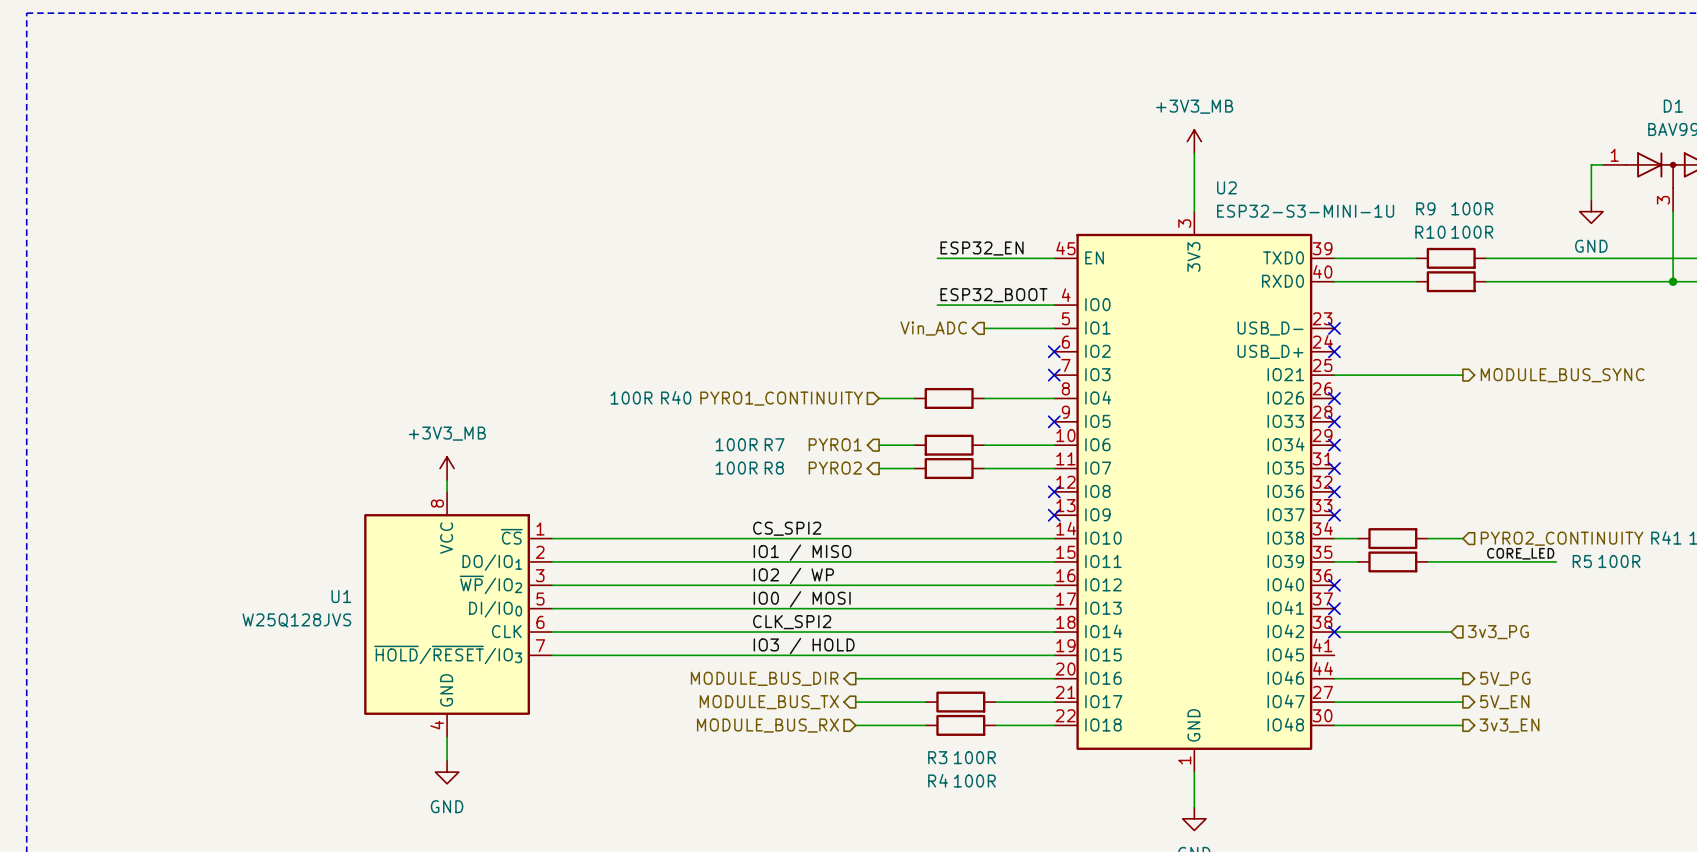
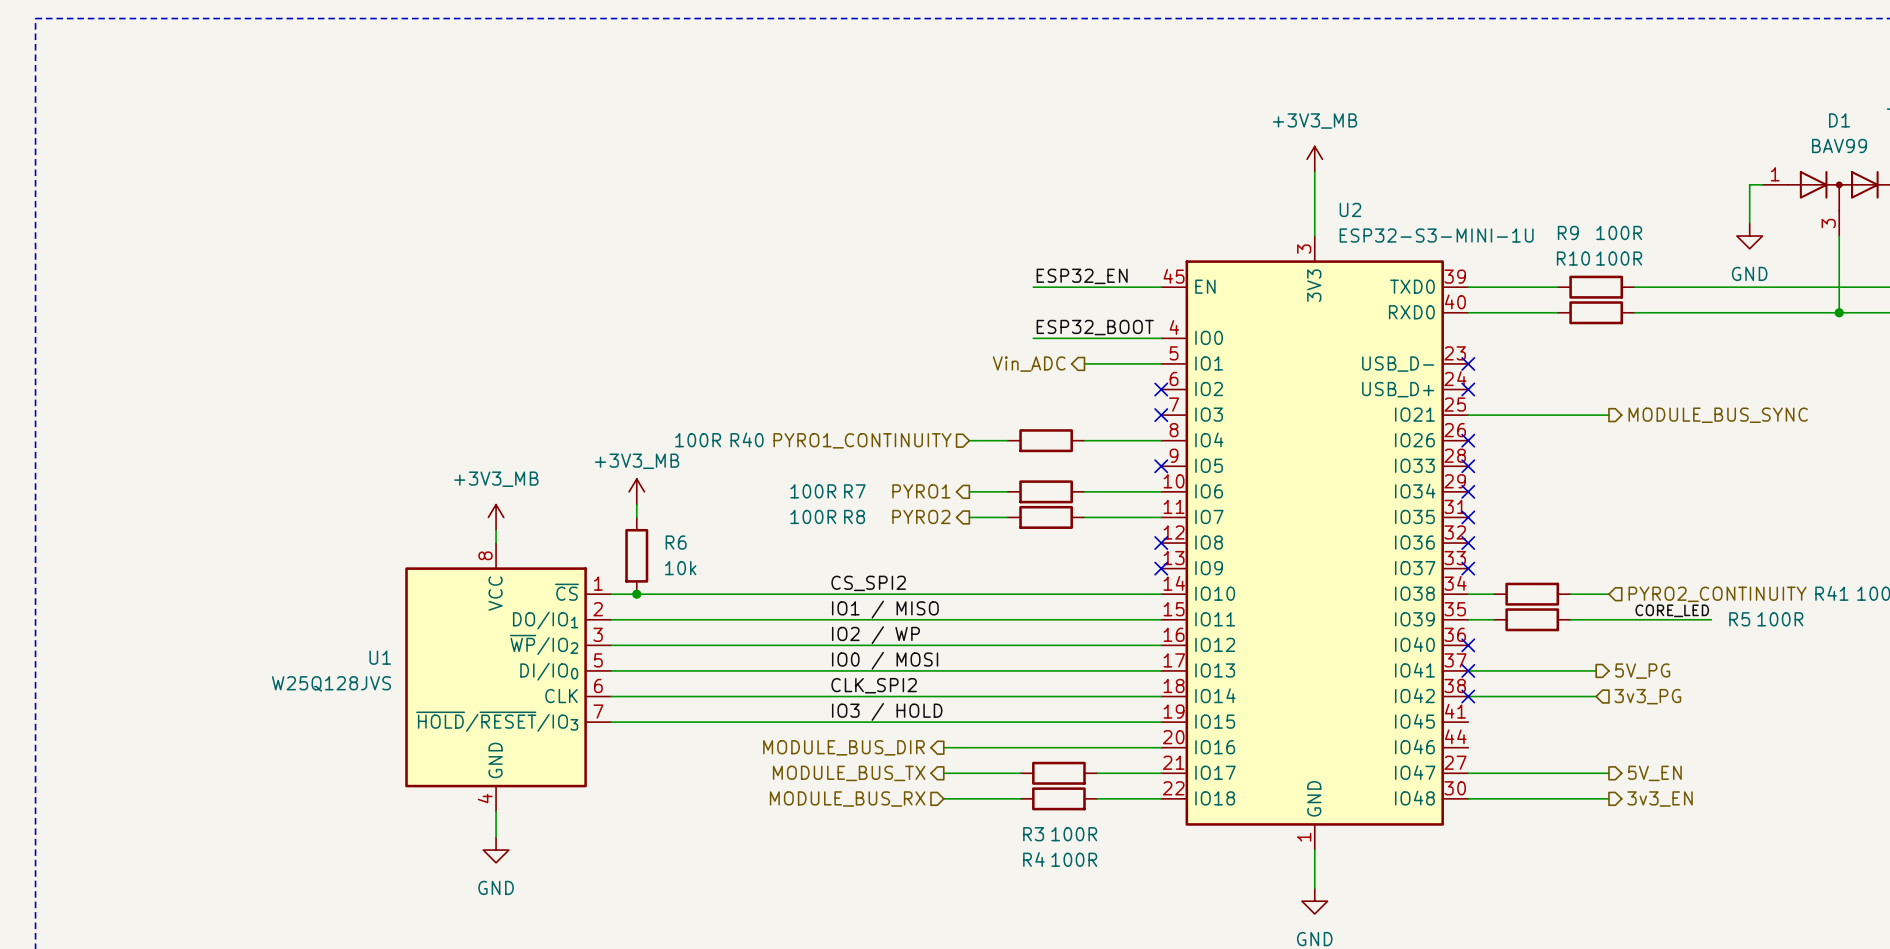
power symbol: none -> +3V3_MB (636, 491)
wire: none -> (636, 504) (636, 517)
R6: none -> 10k (636, 555)
junction: none -> (636, 594)
wire: none -> (1468, 670) (1596, 670)
wire: (1334, 678) (1462, 678) -> none
hierarchical label position: 5V_PG (1505, 678) -> 5V_PG (1642, 671)

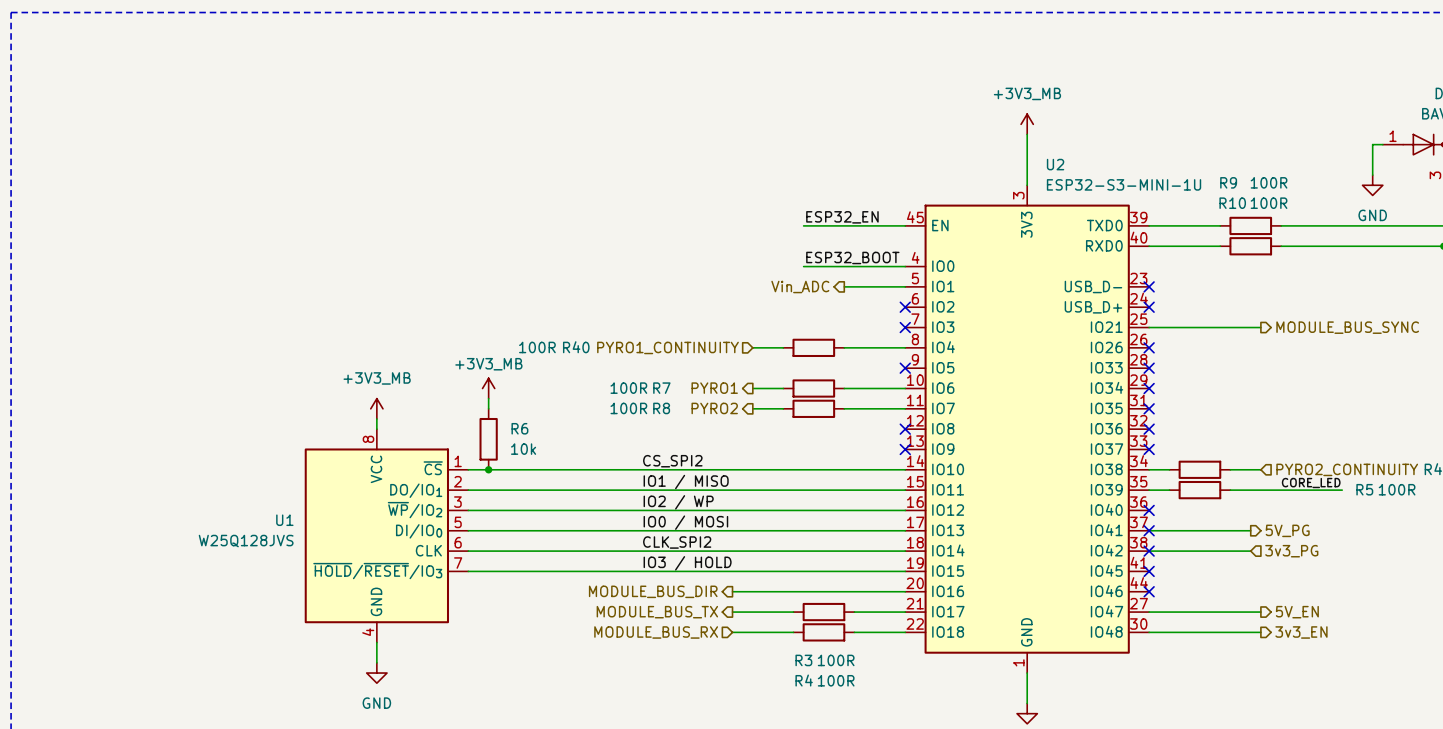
no-connect mark: none -> (1149, 571)
no-connect mark: none -> (1149, 591)

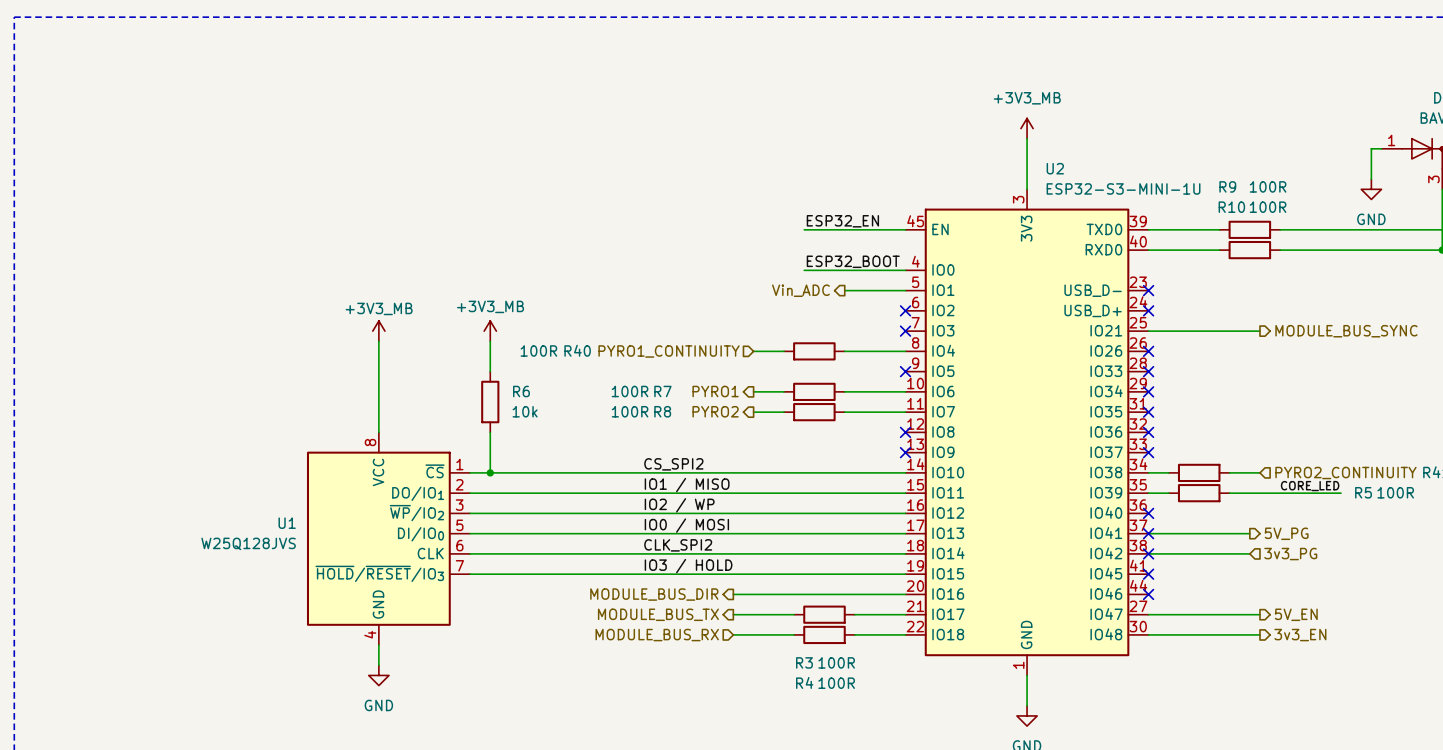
power symbol: none -> +3V3_MB (378, 331)
wire: none -> (378, 341) (378, 422)
wire: none -> (490, 341) (490, 371)
power symbol position: +3V3_MB (488, 388) -> +3V3_MB (490, 331)
wire: (488, 398) (488, 408) -> none
power symbol: +3V3_MB (376, 408) -> none
wire: none -> (490, 432) (490, 472)
R6 position: (488, 439) -> (490, 402)

